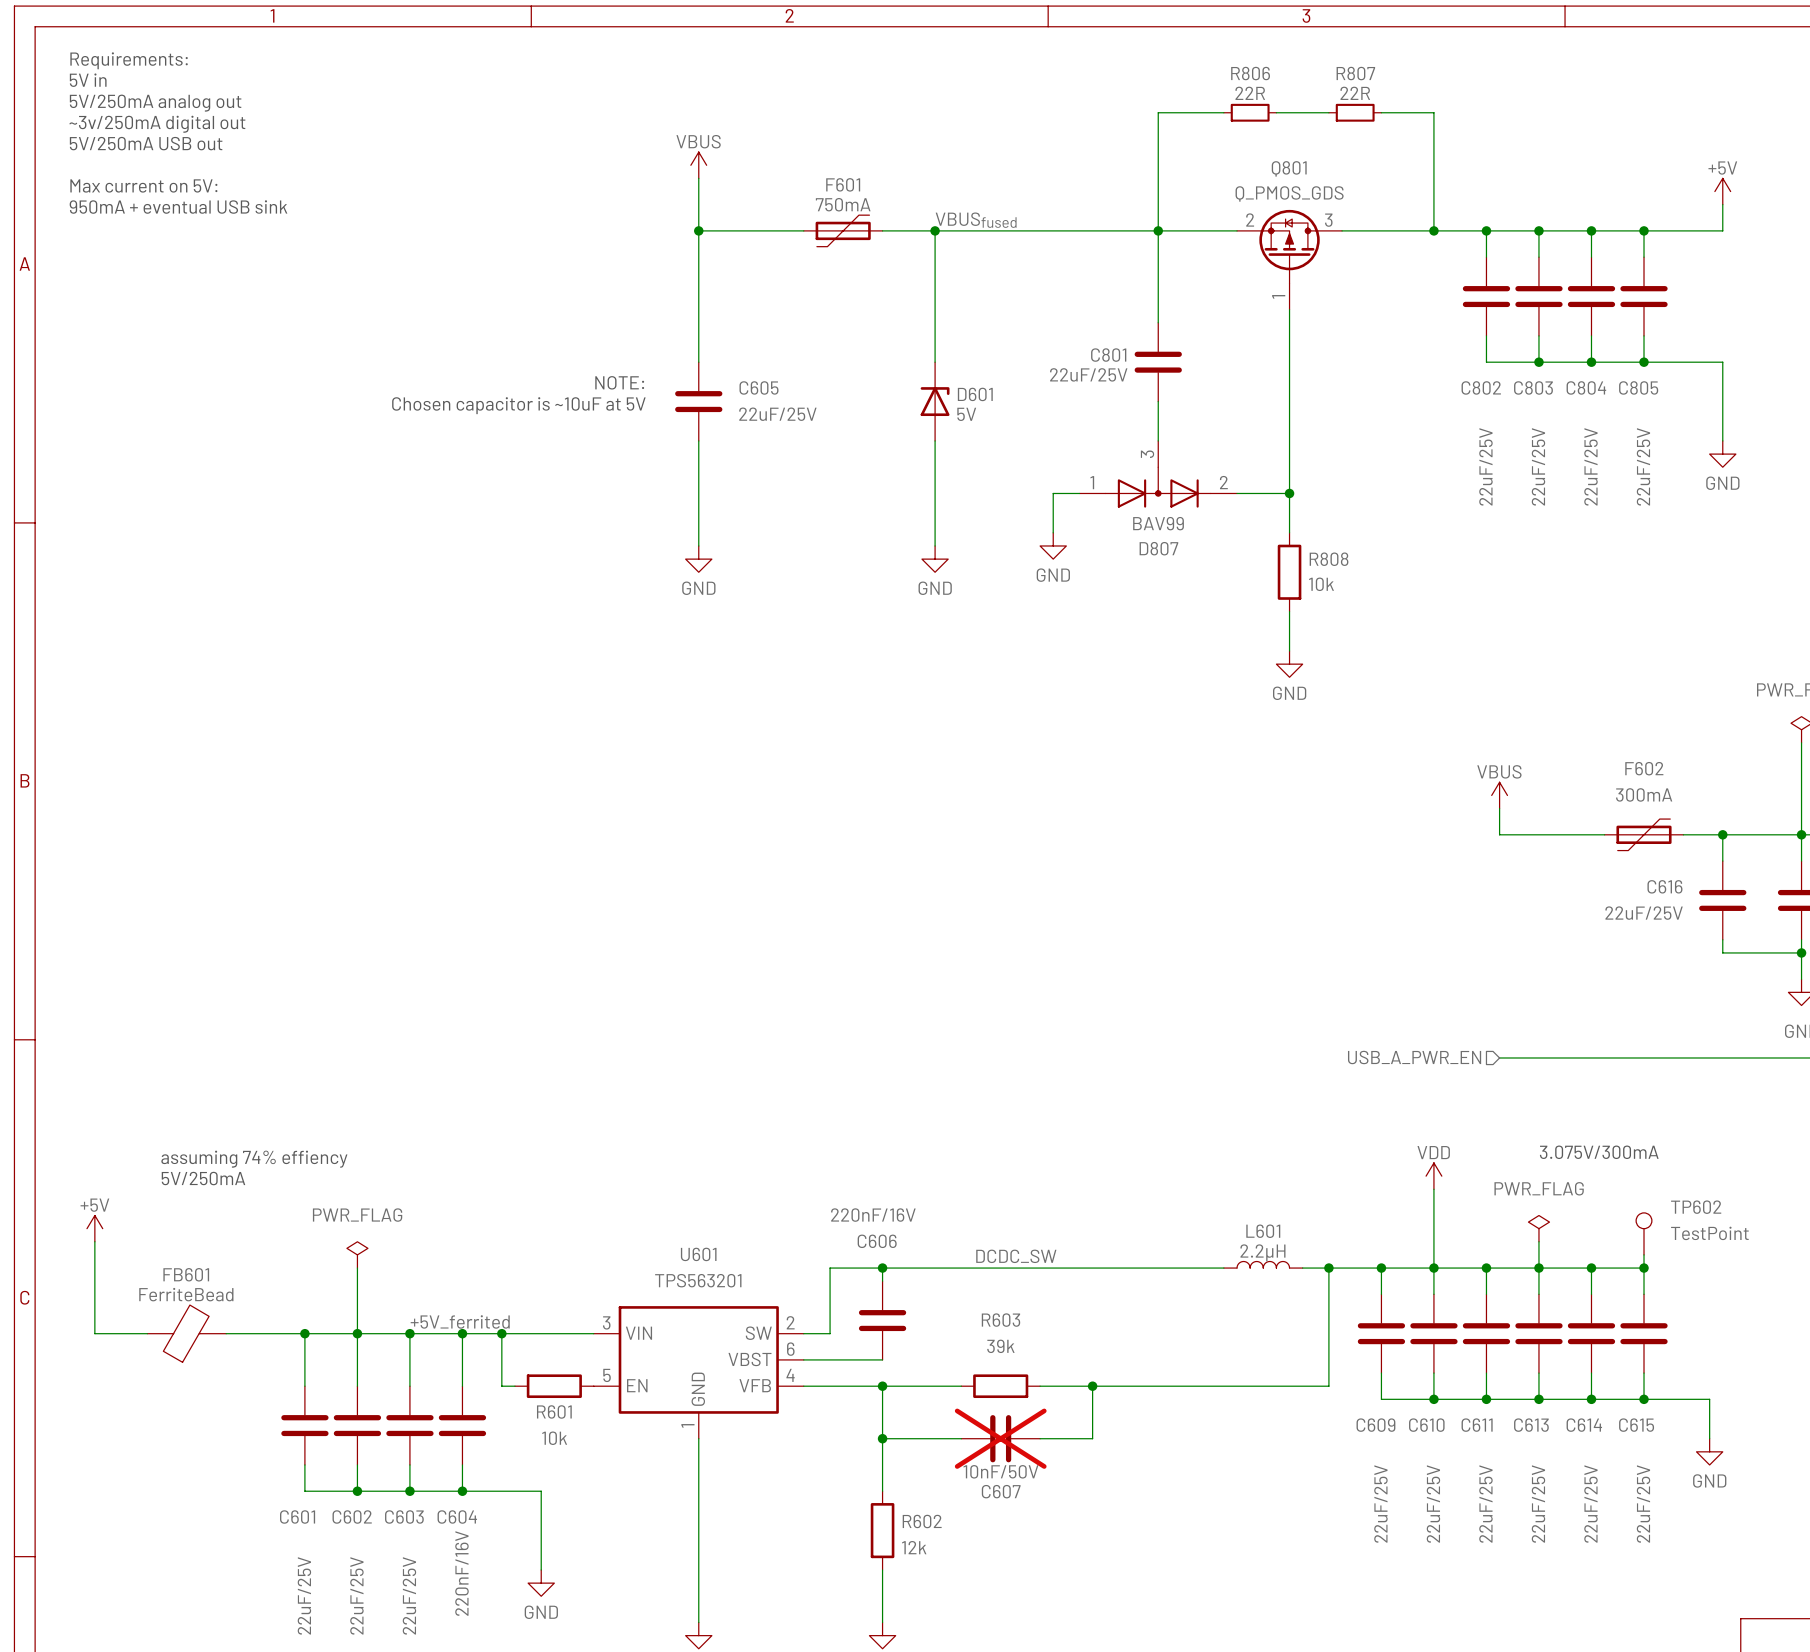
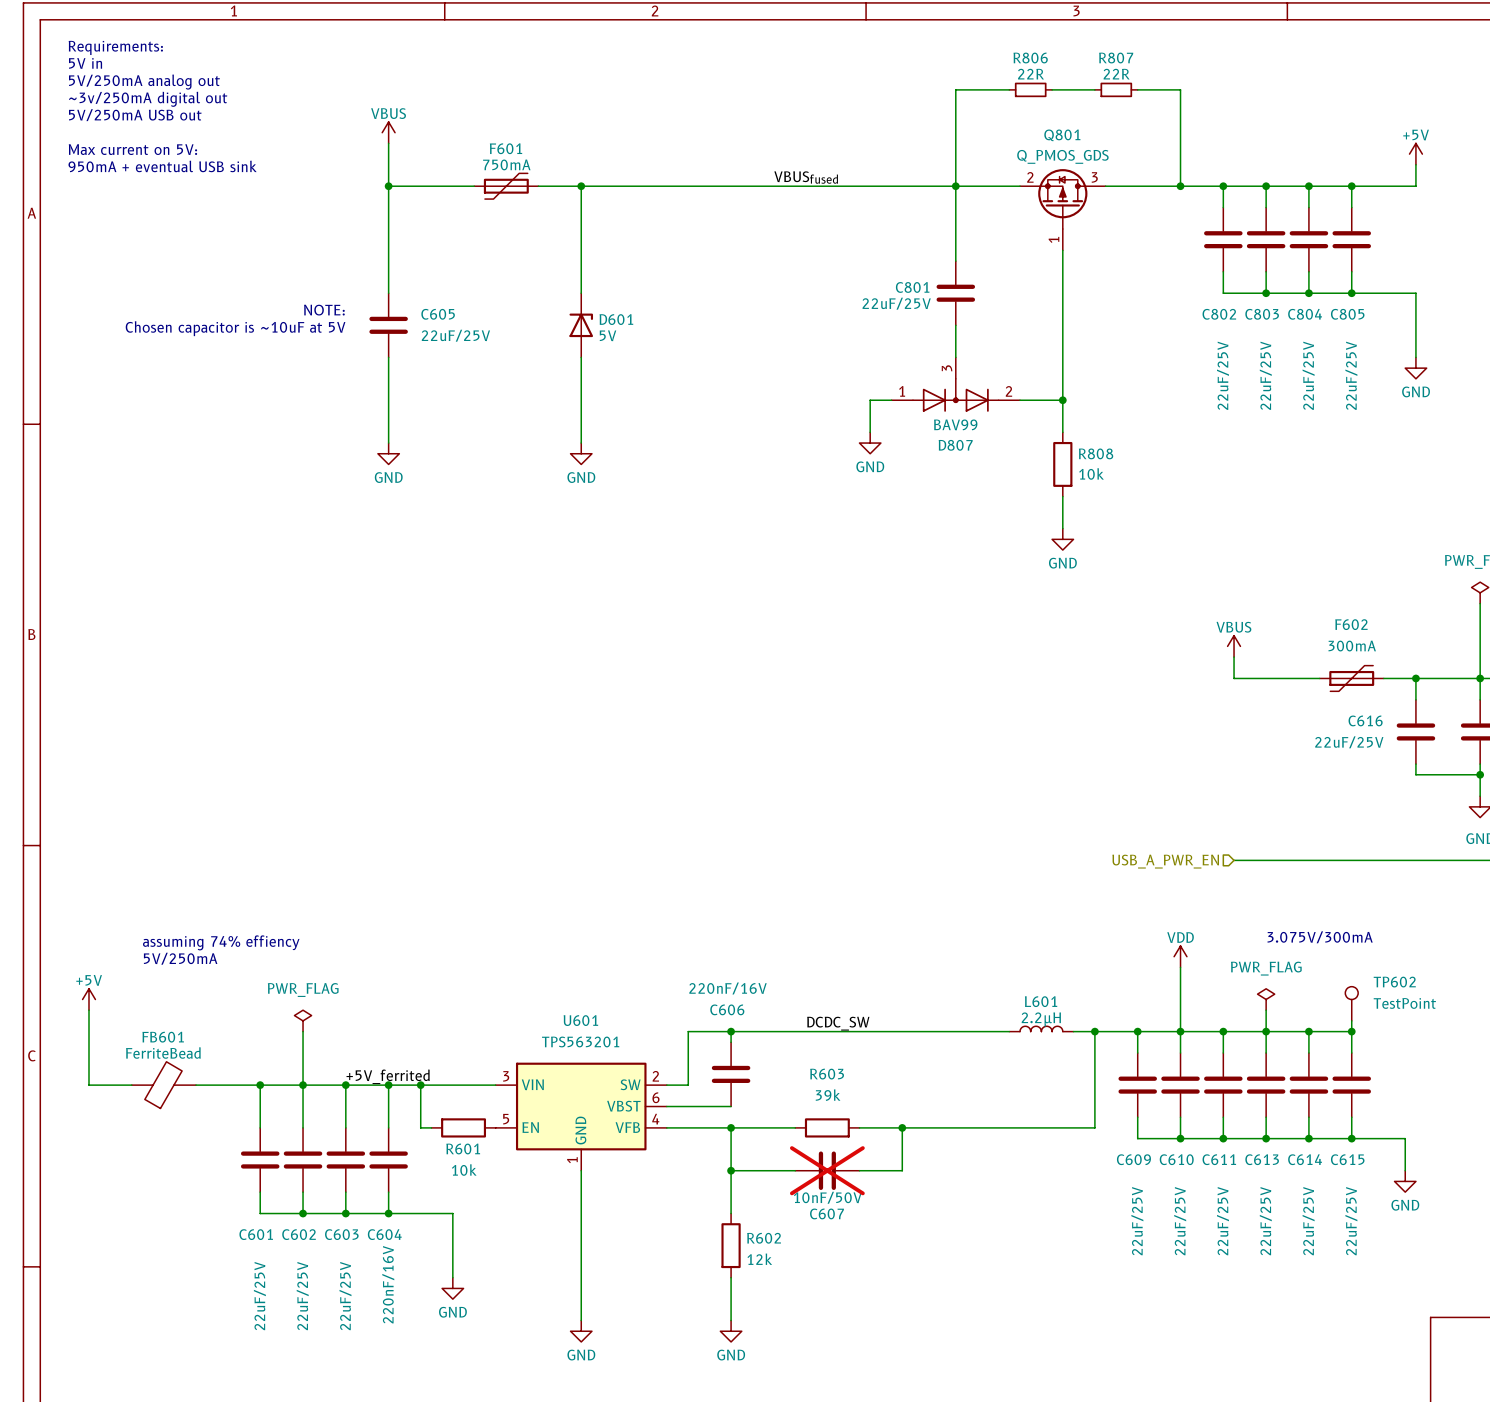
power symbol position: VBUS (698, 165) -> VBUS (388, 132)
wire: none -> (388, 143) (388, 293)
wire: (698, 178) (698, 230) -> (538, 186) (581, 186)
wire: none -> (388, 186) (474, 186)
junction: none -> (388, 186)
F601 position: (843, 230) -> (506, 186)
wire: (935, 230) (935, 362) -> none
junction: (935, 230) -> none
text position: NOTE: (619, 382) -> NOTE: (324, 310)
C605 position: (698, 401) -> (388, 325)
D601 position: (935, 401) -> (581, 325)
text position: Chosen capacitor is ~10uF at 5V (518, 405) -> Chosen capacitor is ~10uF at 5V (235, 328)
wire: none -> (388, 357) (388, 443)
wire: (935, 440) (935, 545) -> none
power symbol: none -> GND (388, 453)
power symbol: GND (935, 559) -> none

